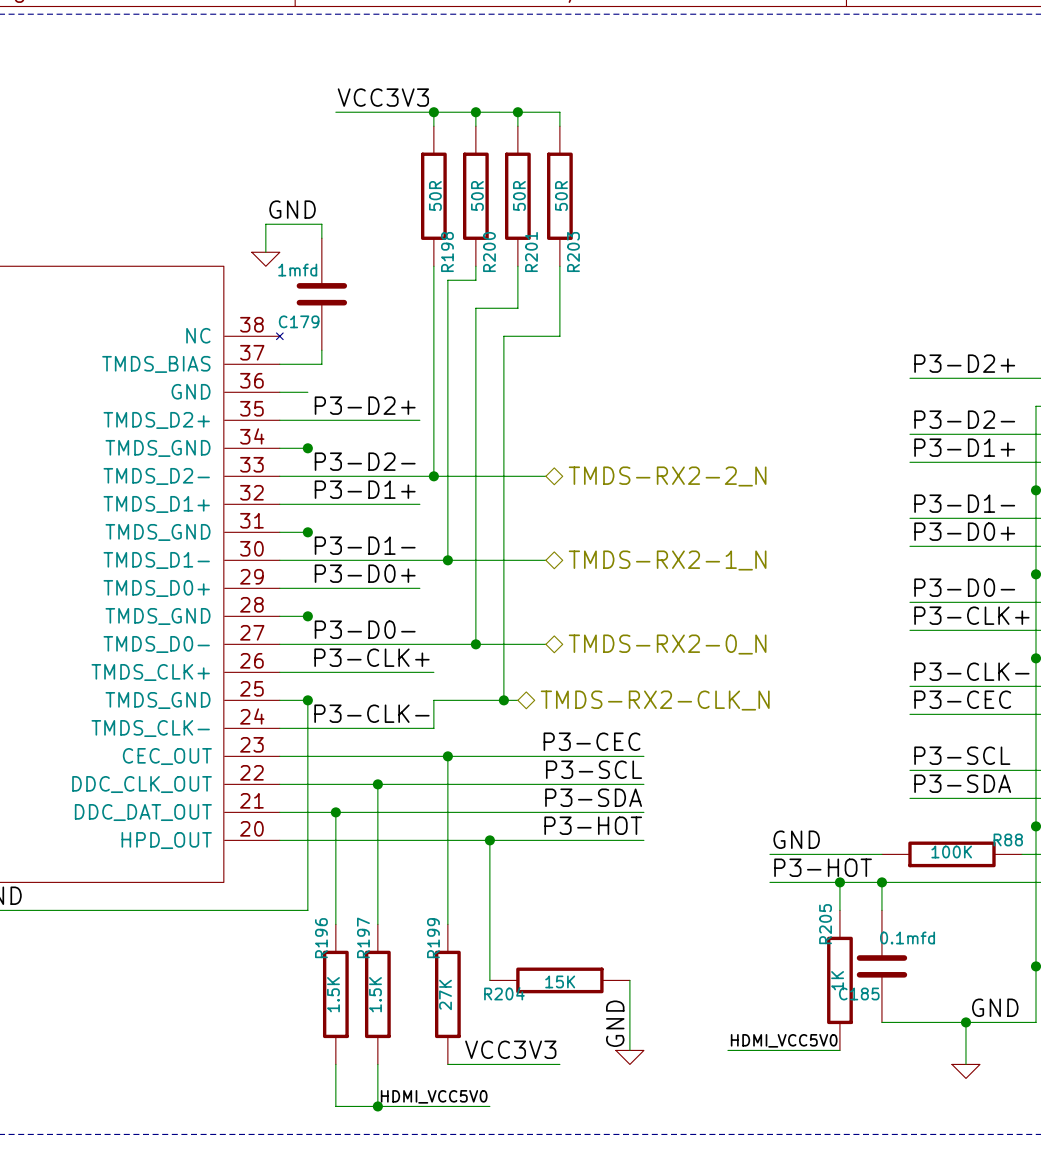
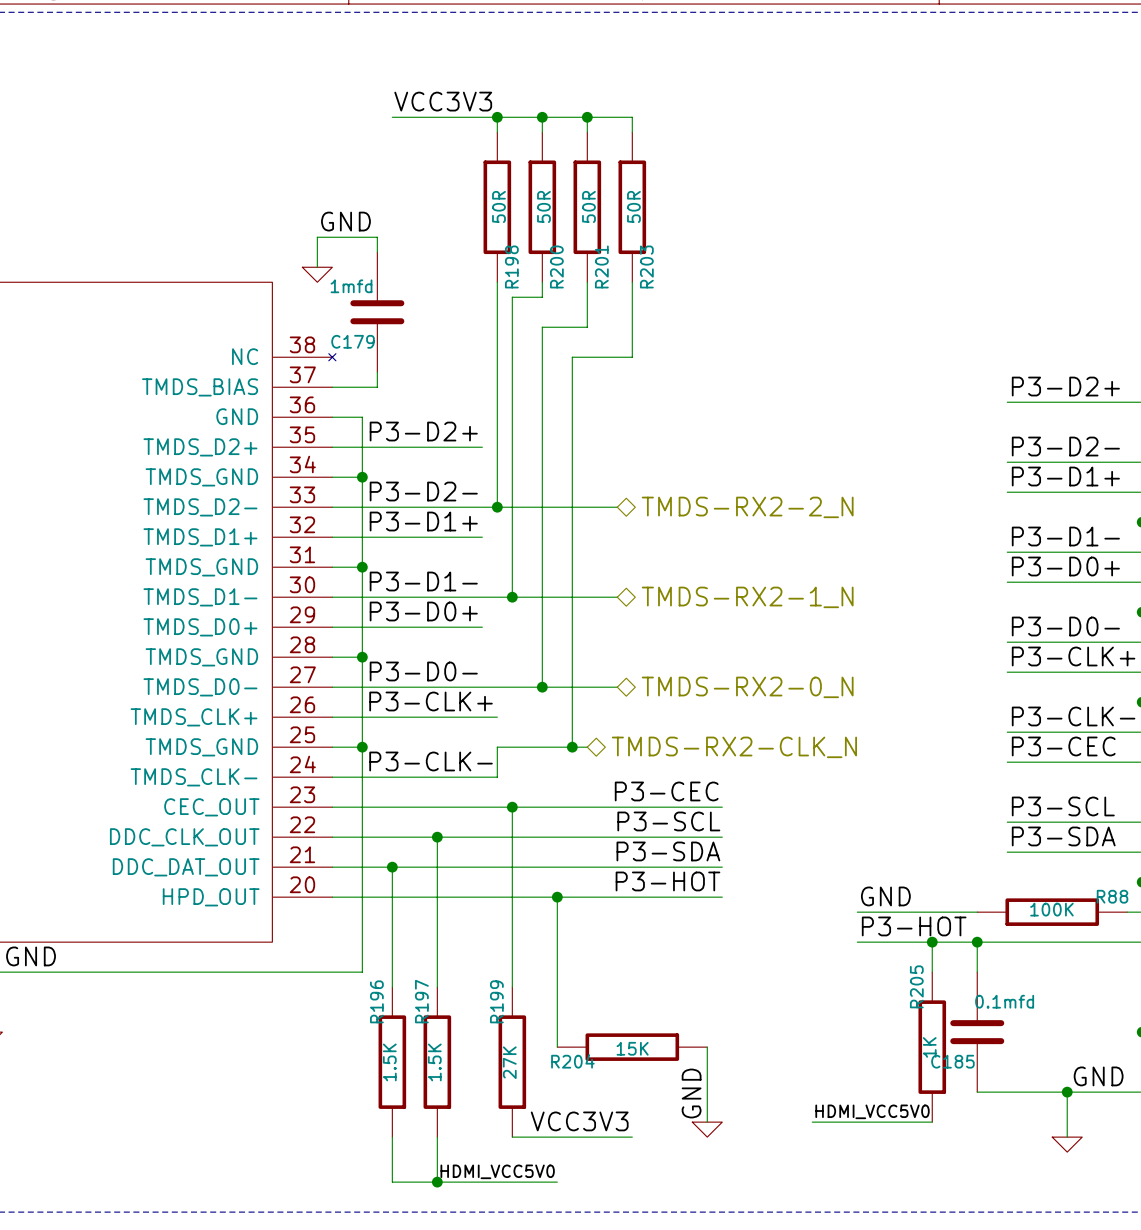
wire: none -> (362, 417) (362, 747)

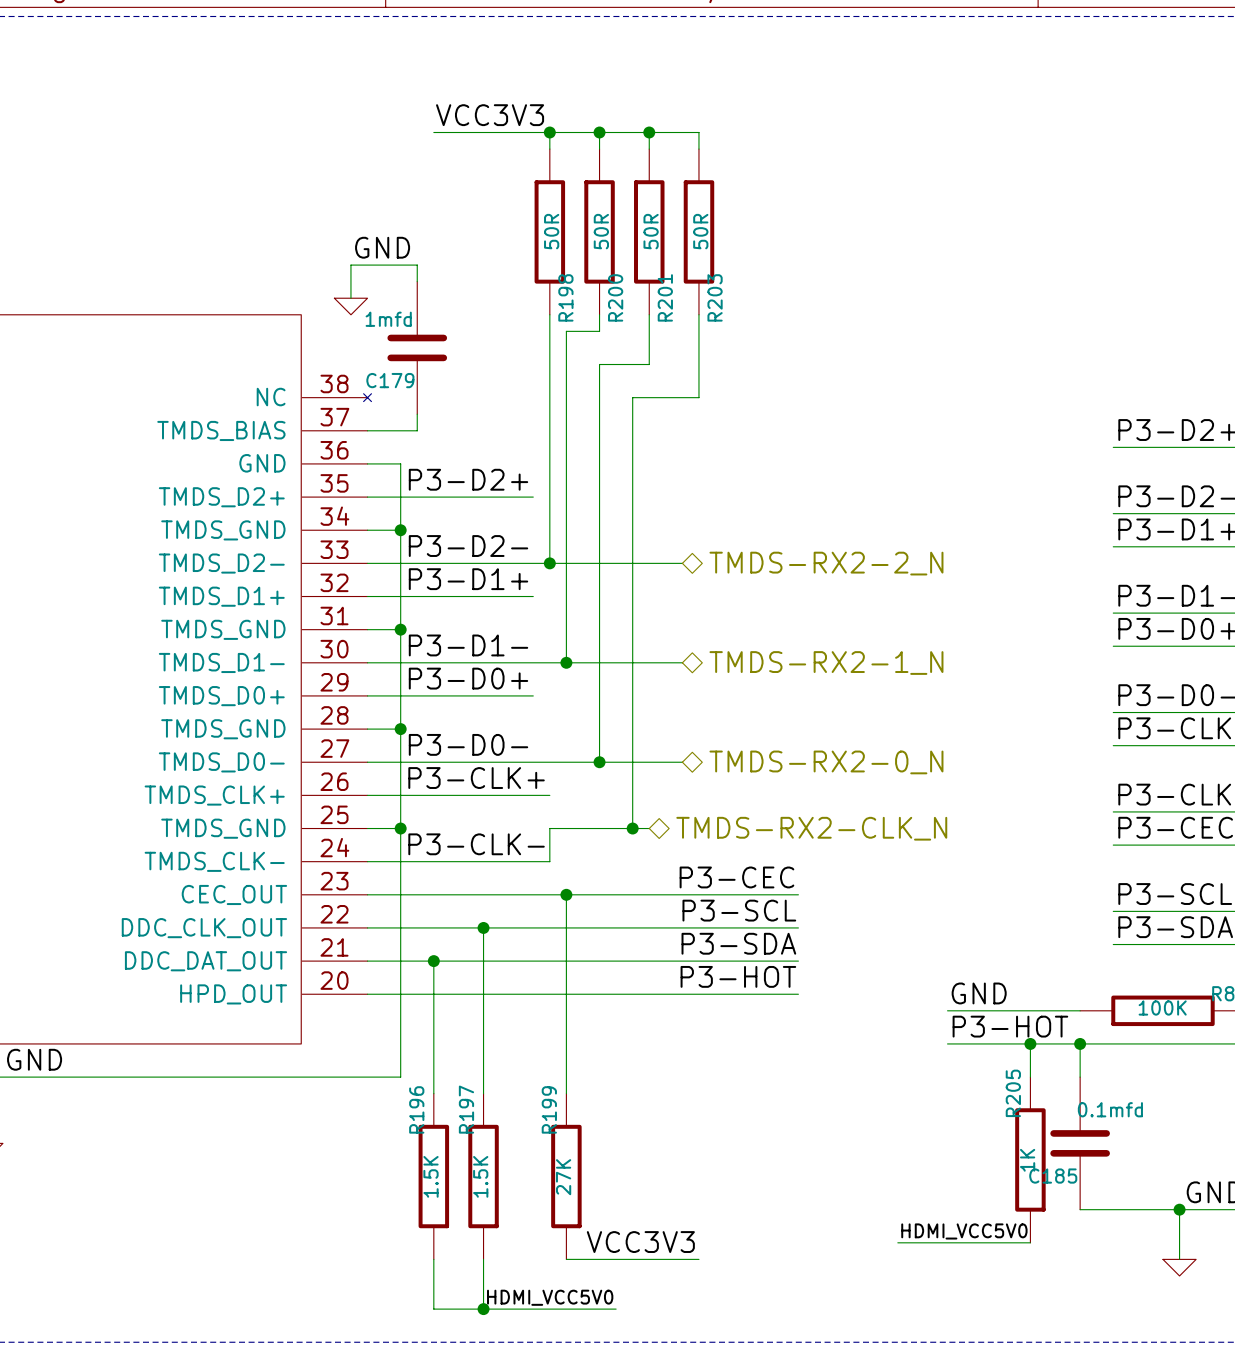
wire: (557, 897) (557, 1047) -> none
junction: (557, 897) -> none
R204: 15K (632, 1047) -> none
wire: (707, 1047) (707, 1122) -> none
label: GND (691, 1093) -> none
power symbol: (707, 1129) -> none

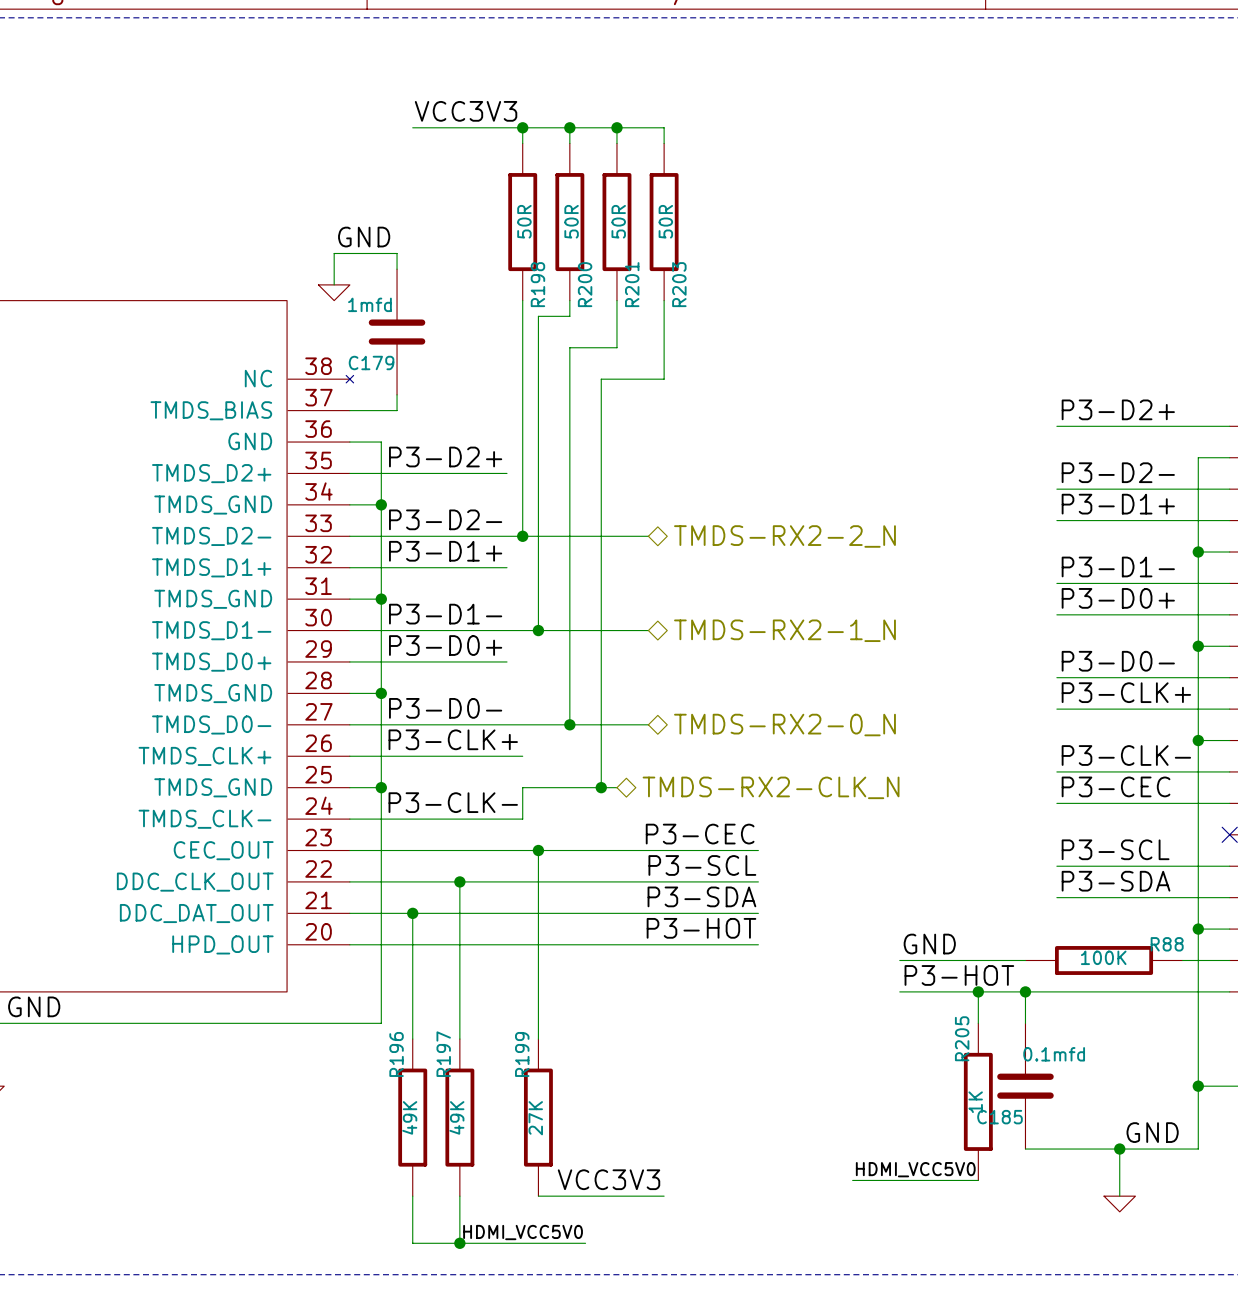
R196 value: 1.5K (431, 1176) -> 49K (409, 1117)
R197 value: 1.5K (480, 1176) -> 49K (456, 1117)

